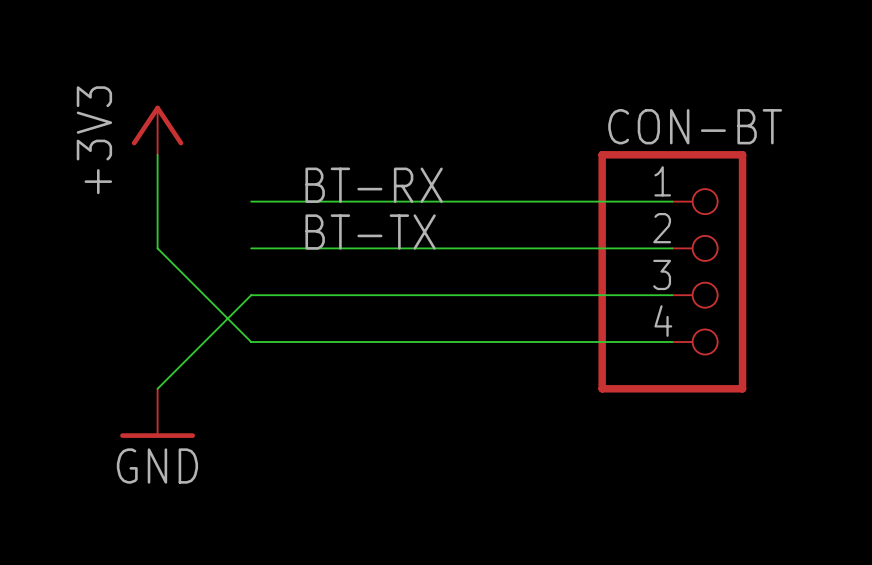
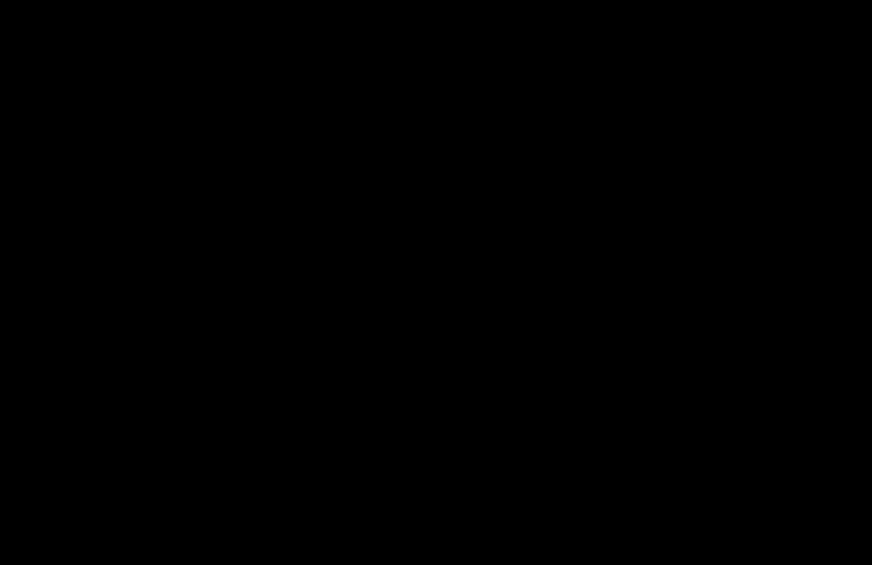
power symbol: +3V3 (157, 130) -> none
wire: (157, 154) (157, 248) (251, 342) (672, 342) -> none
label: BT-RX (374, 185) -> none
wire: (251, 201) (672, 201) -> none
label: BT-TX (370, 232) -> none
wire: (251, 248) (672, 248) -> none
CON-BT: (672, 271) -> none
wire: (672, 295) (251, 295) (157, 388) -> none
power symbol: GND (157, 413) -> none

